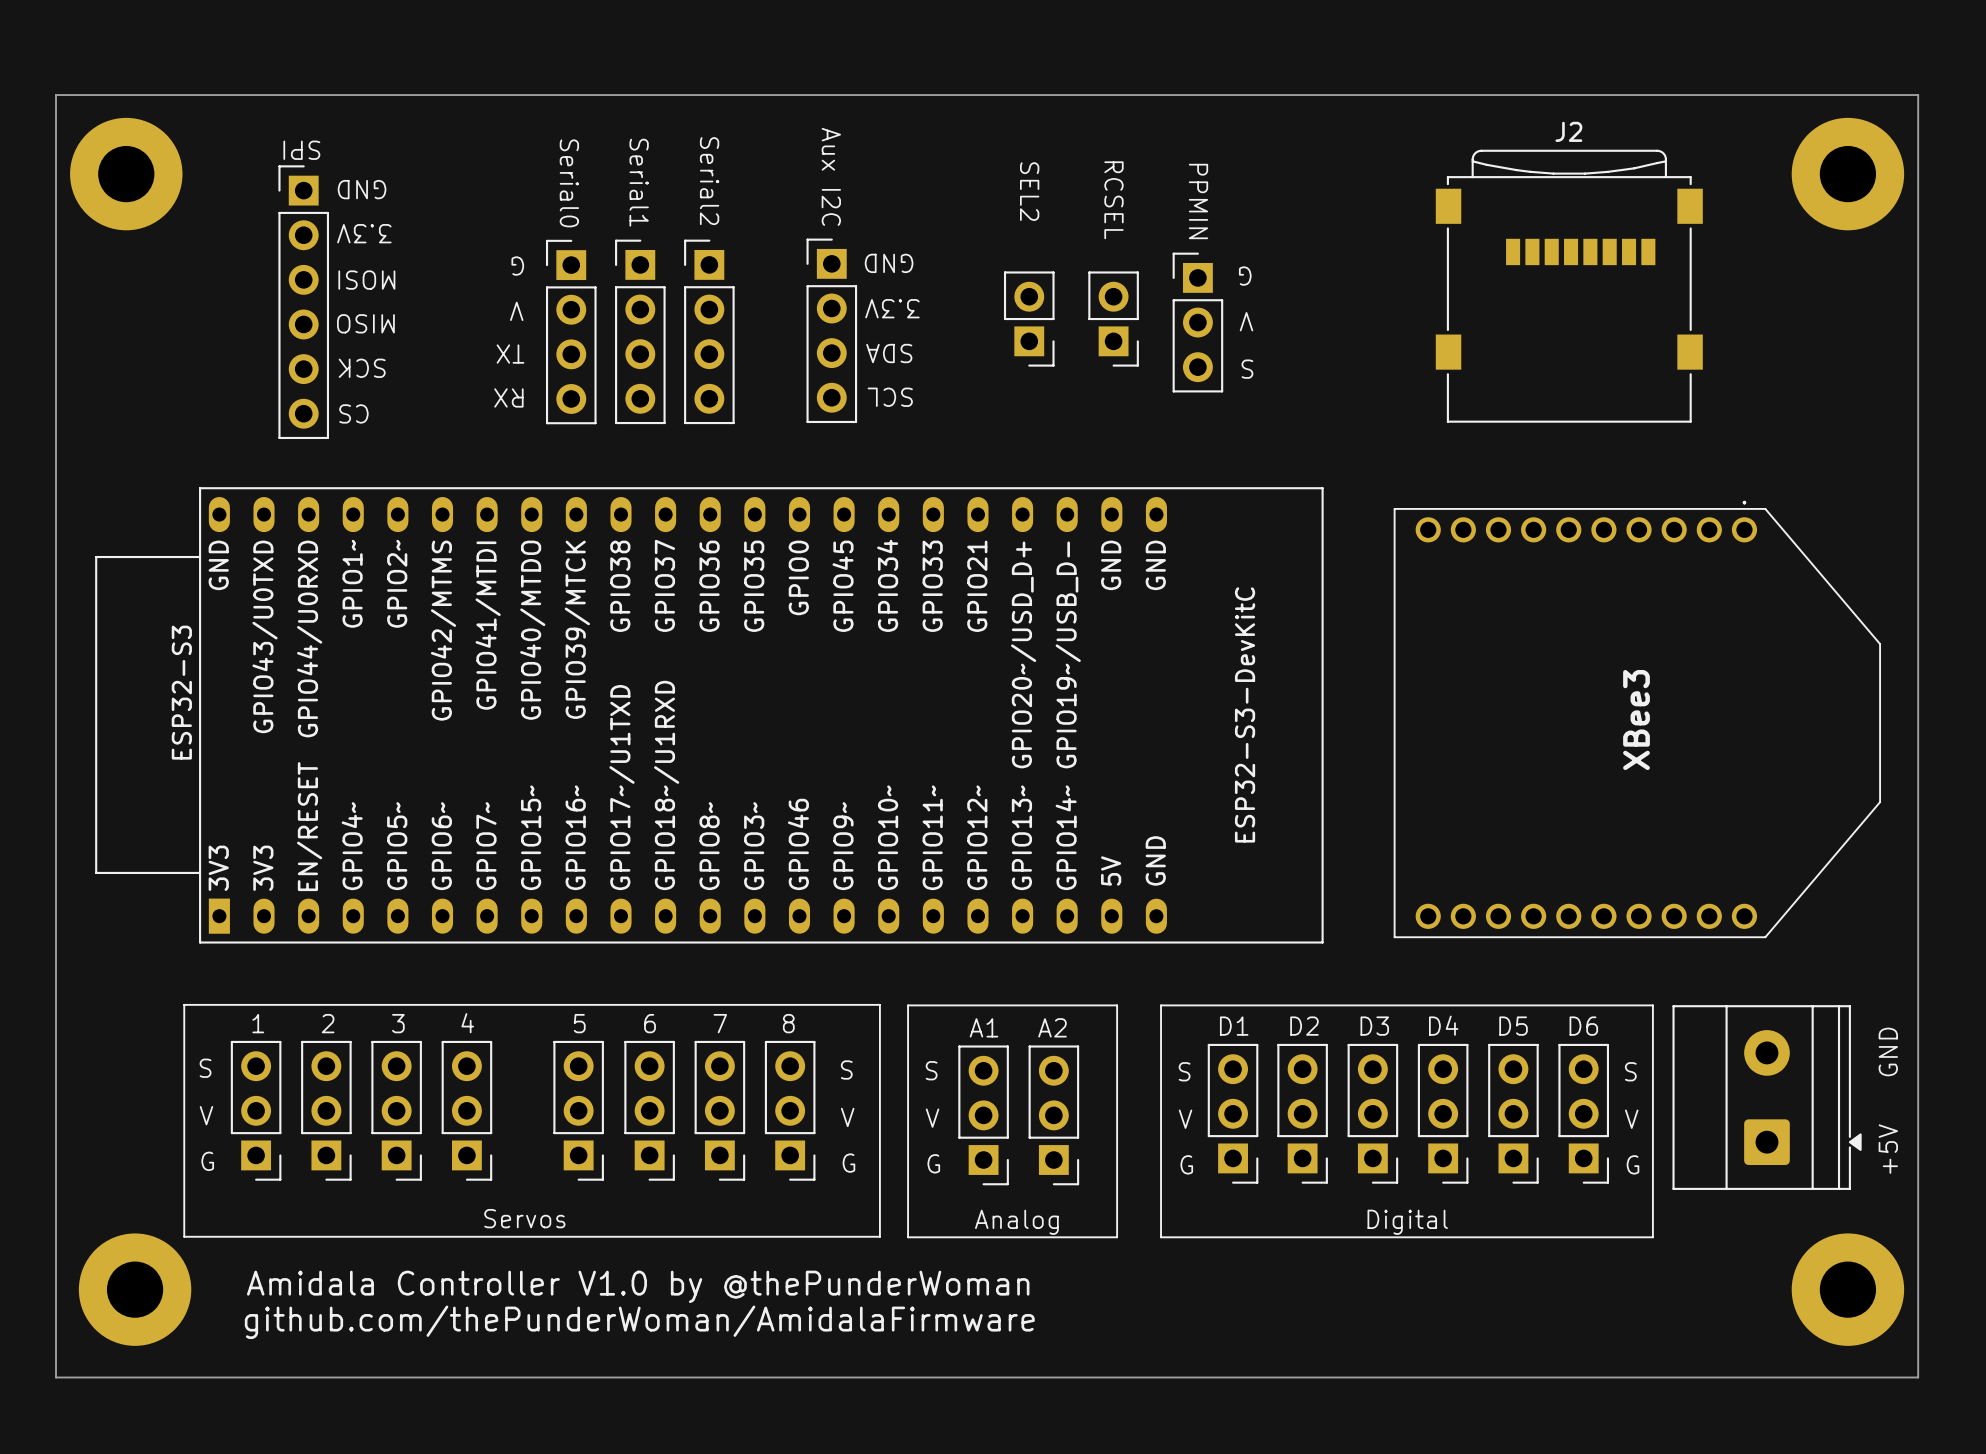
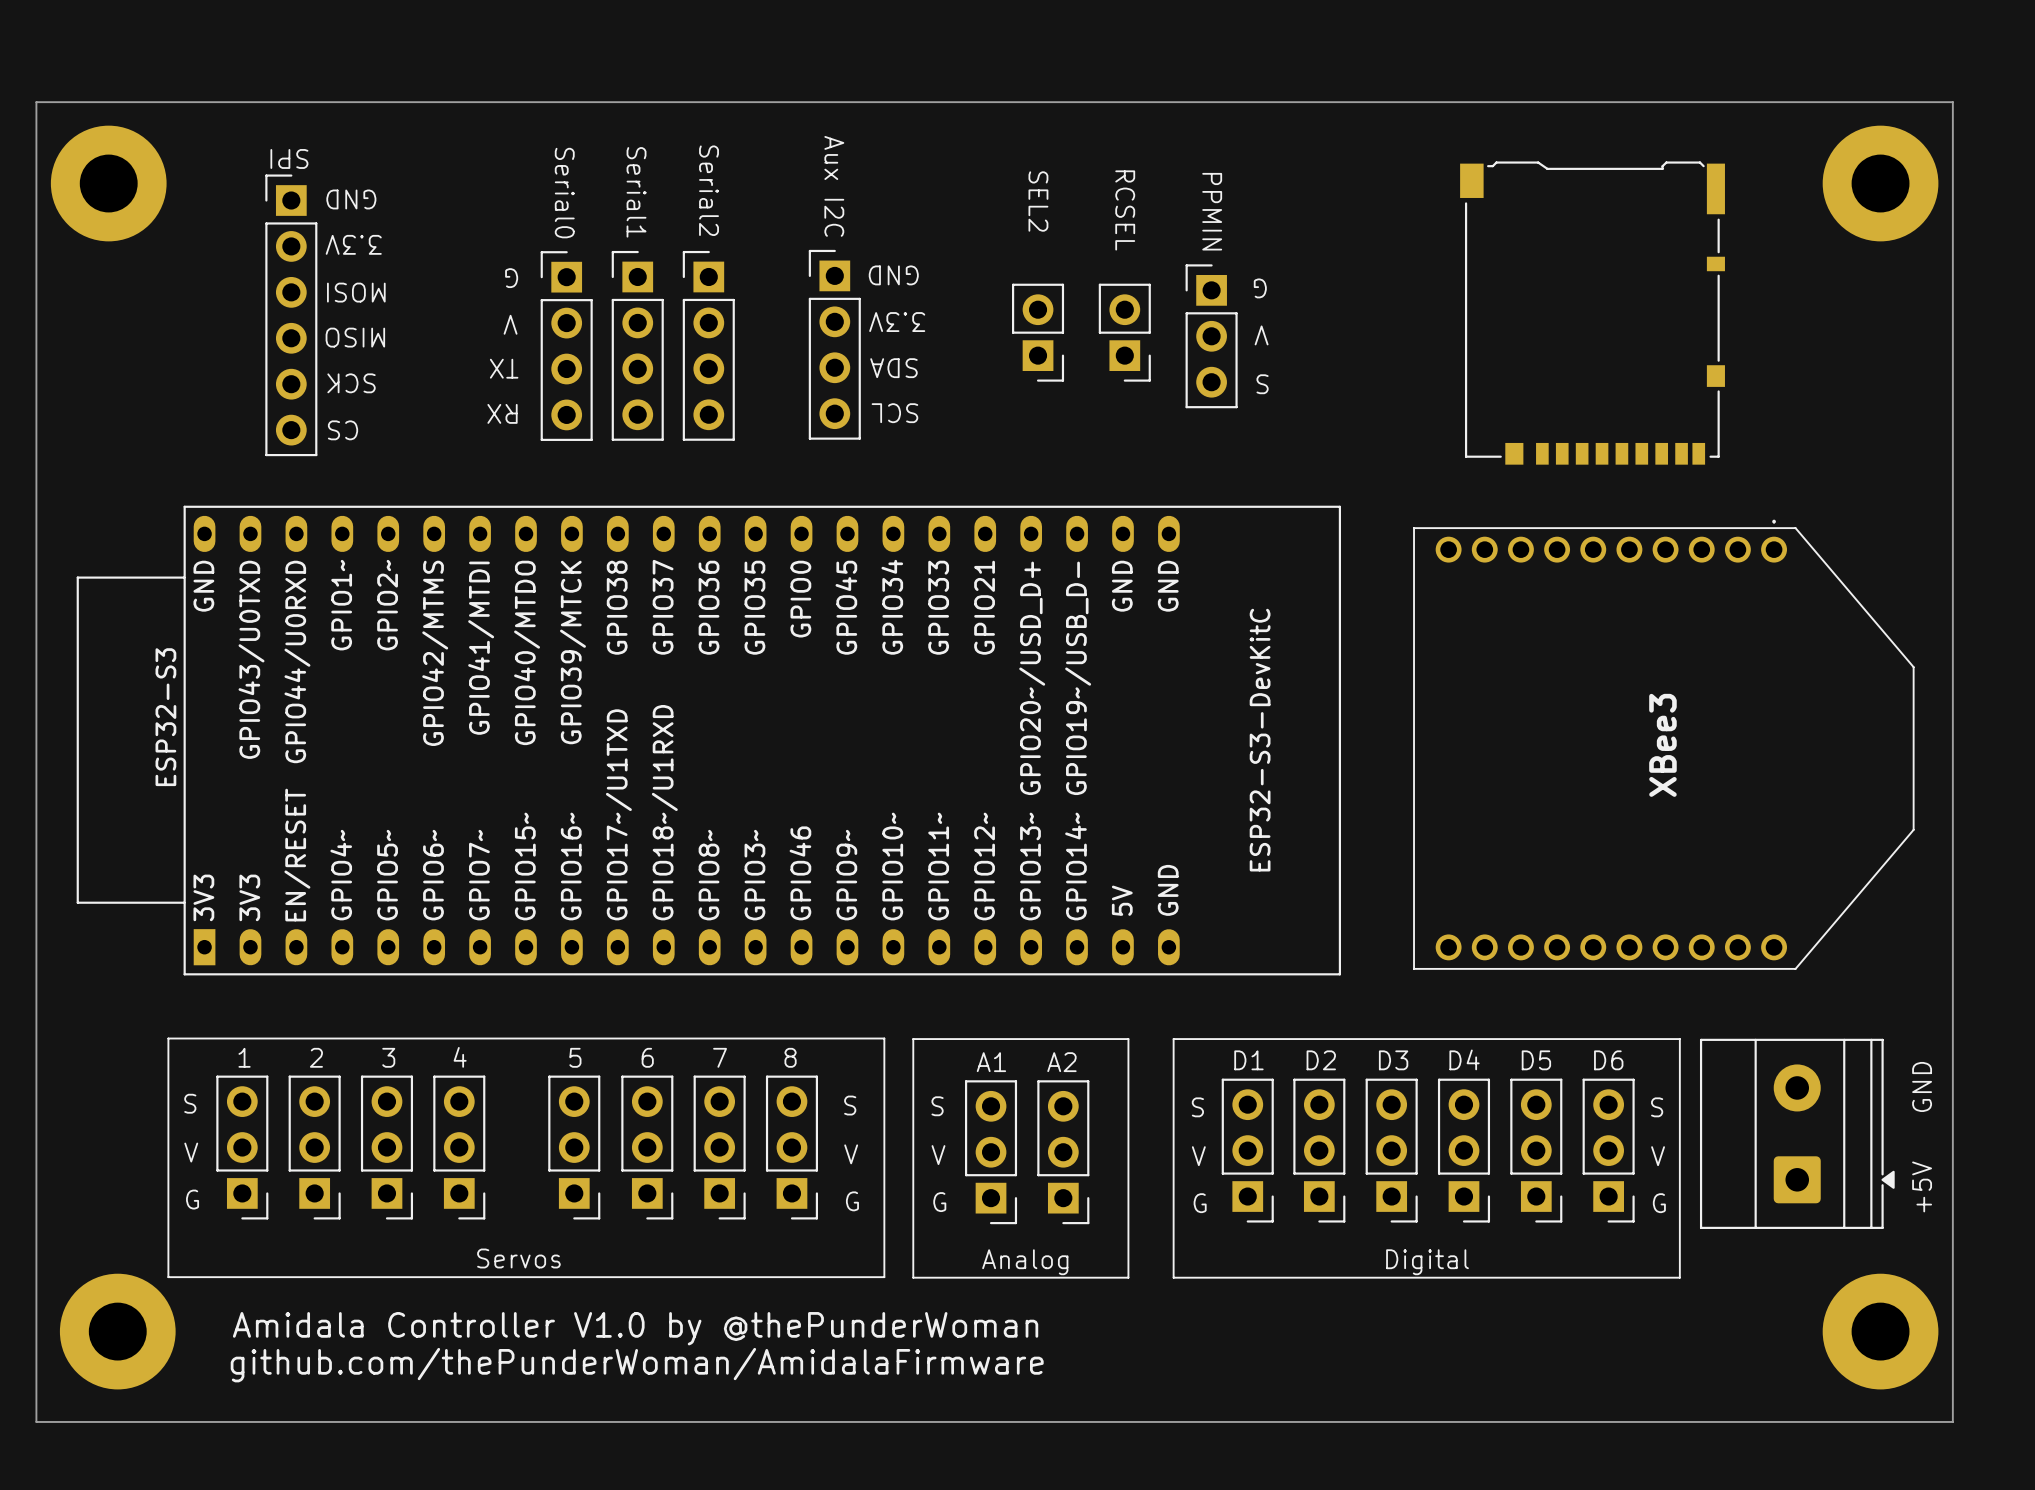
J2: (1569, 286) -> none
part: none -> (1592, 313)

